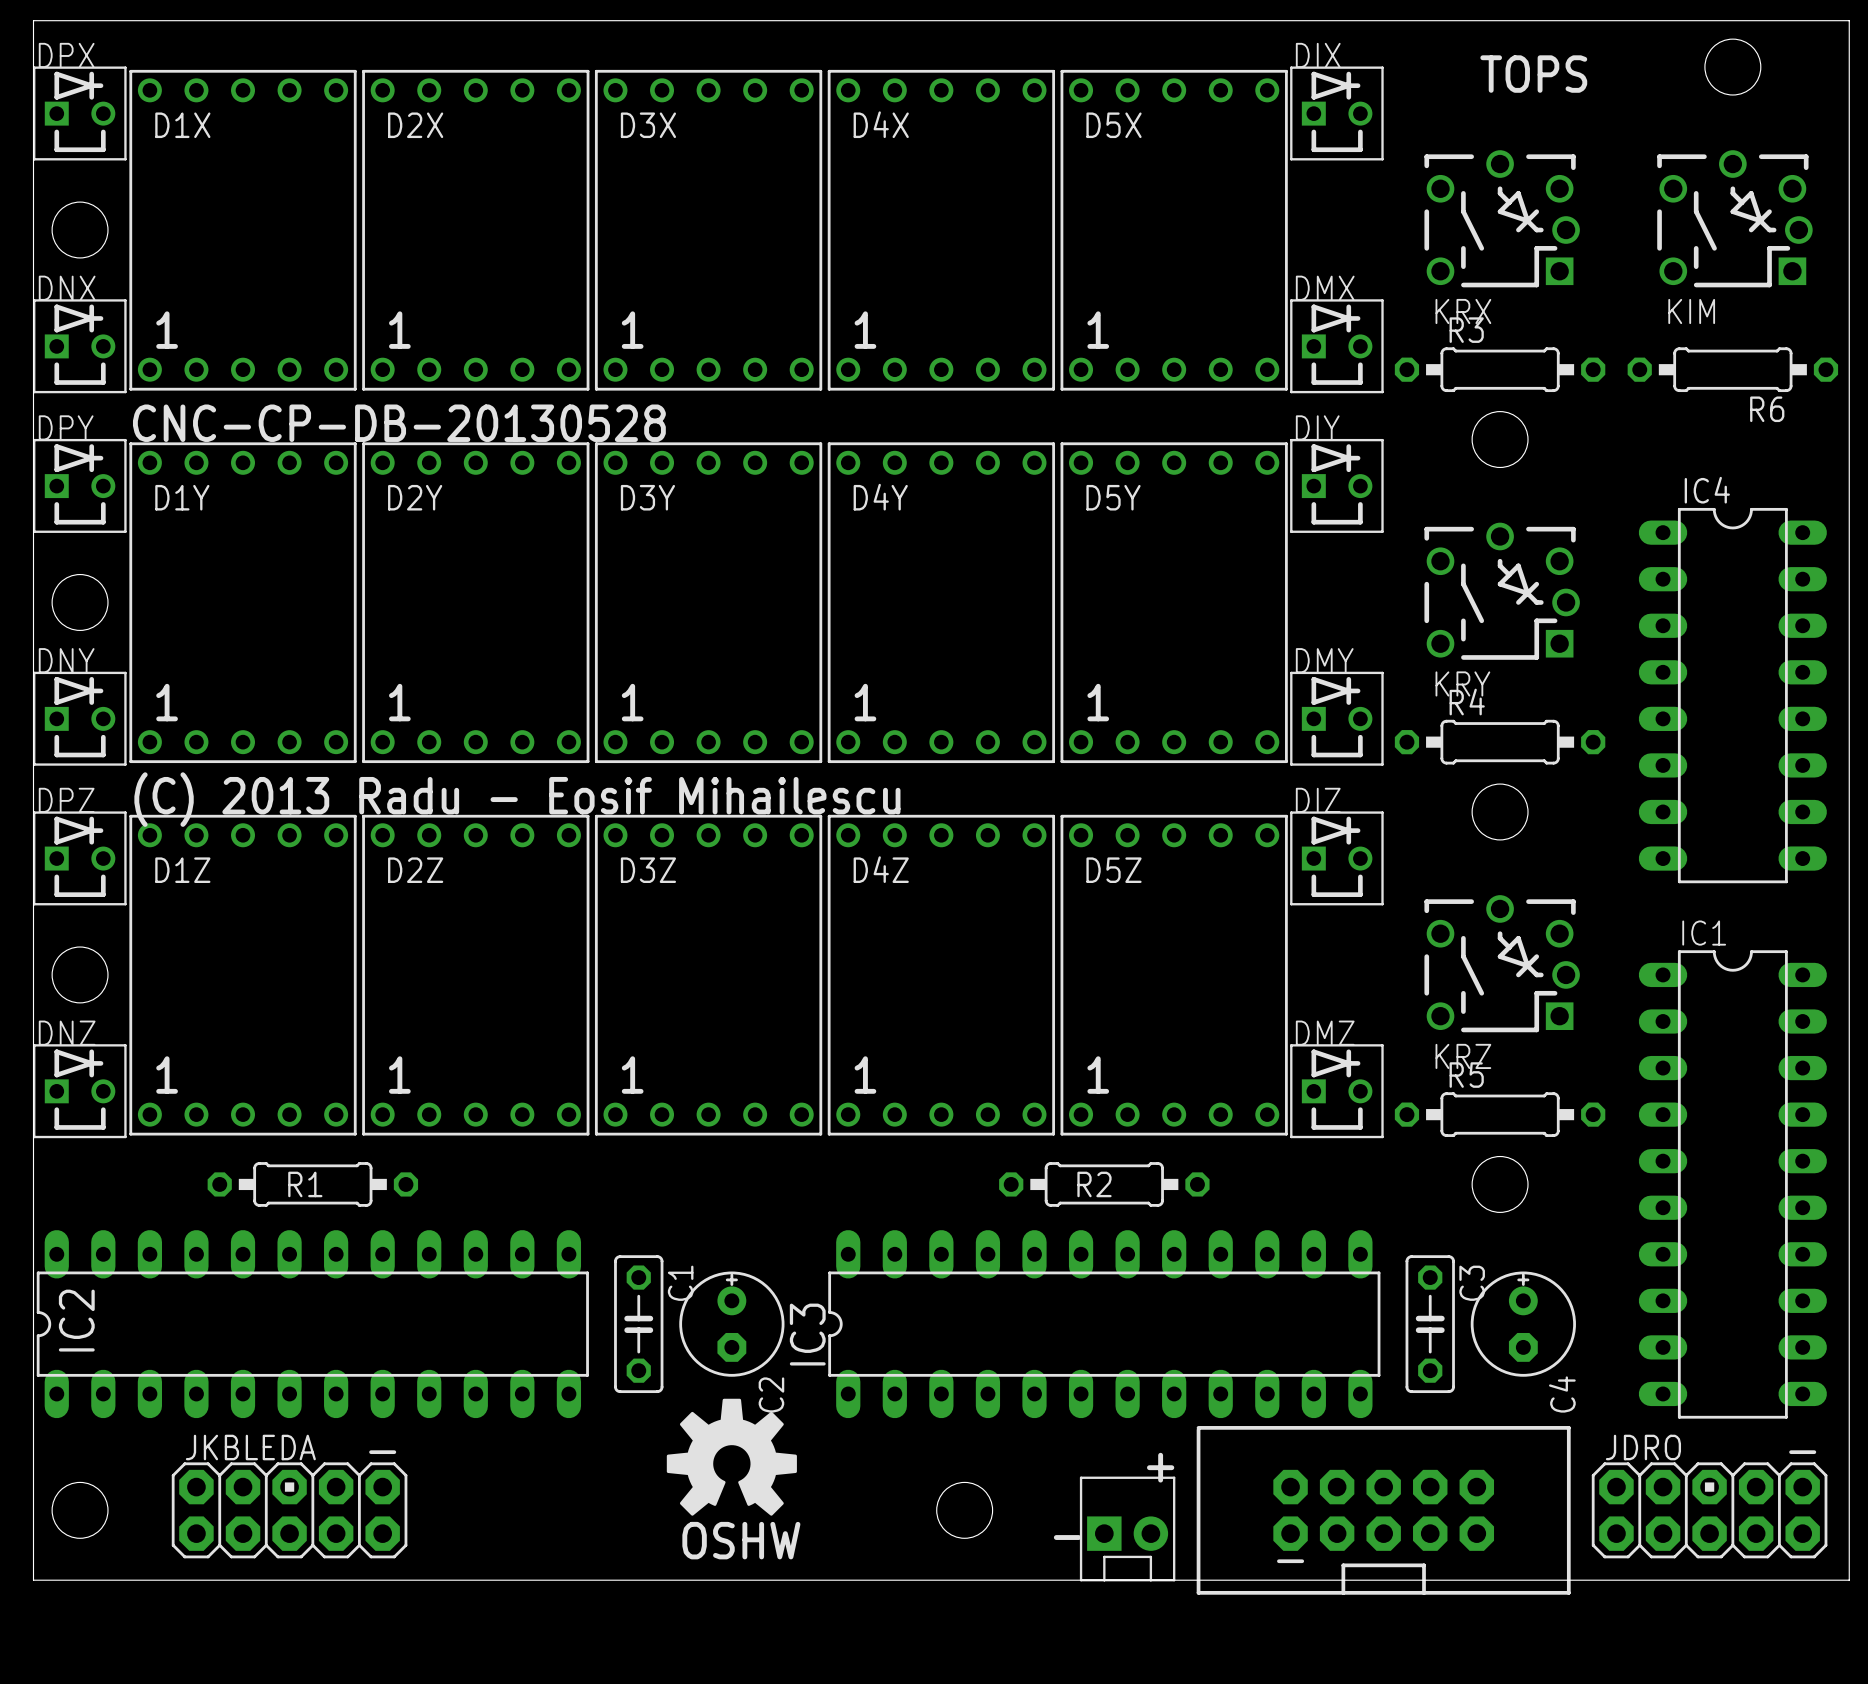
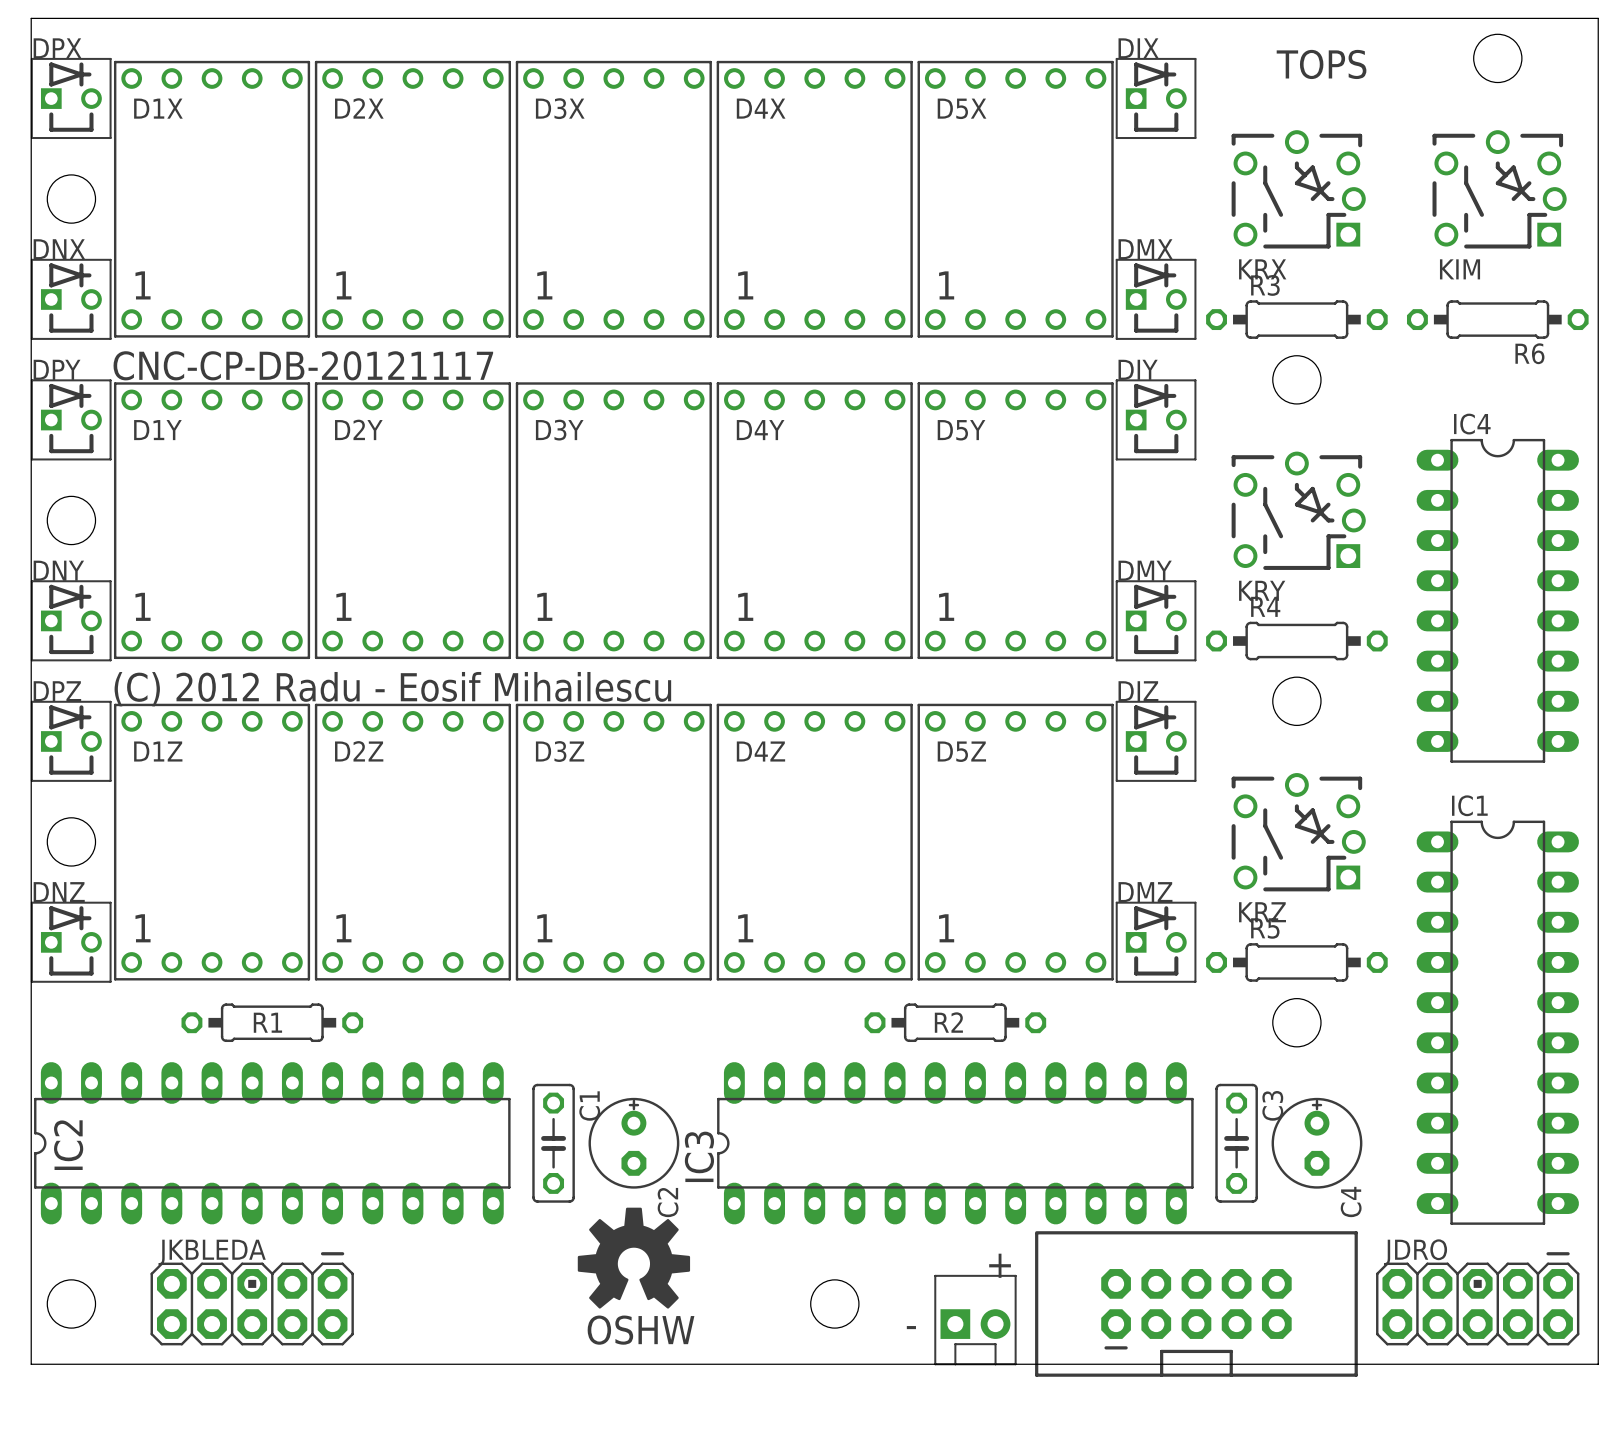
text: CNC-CP-DB-20130528 (399, 423) -> CNC-CP-DB-20121117 (303, 365)
text: (C) 2013 Radu - Eosif Mihailescu (517, 799) -> (C) 2012 Radu - Eosif Mihailescu (392, 689)

